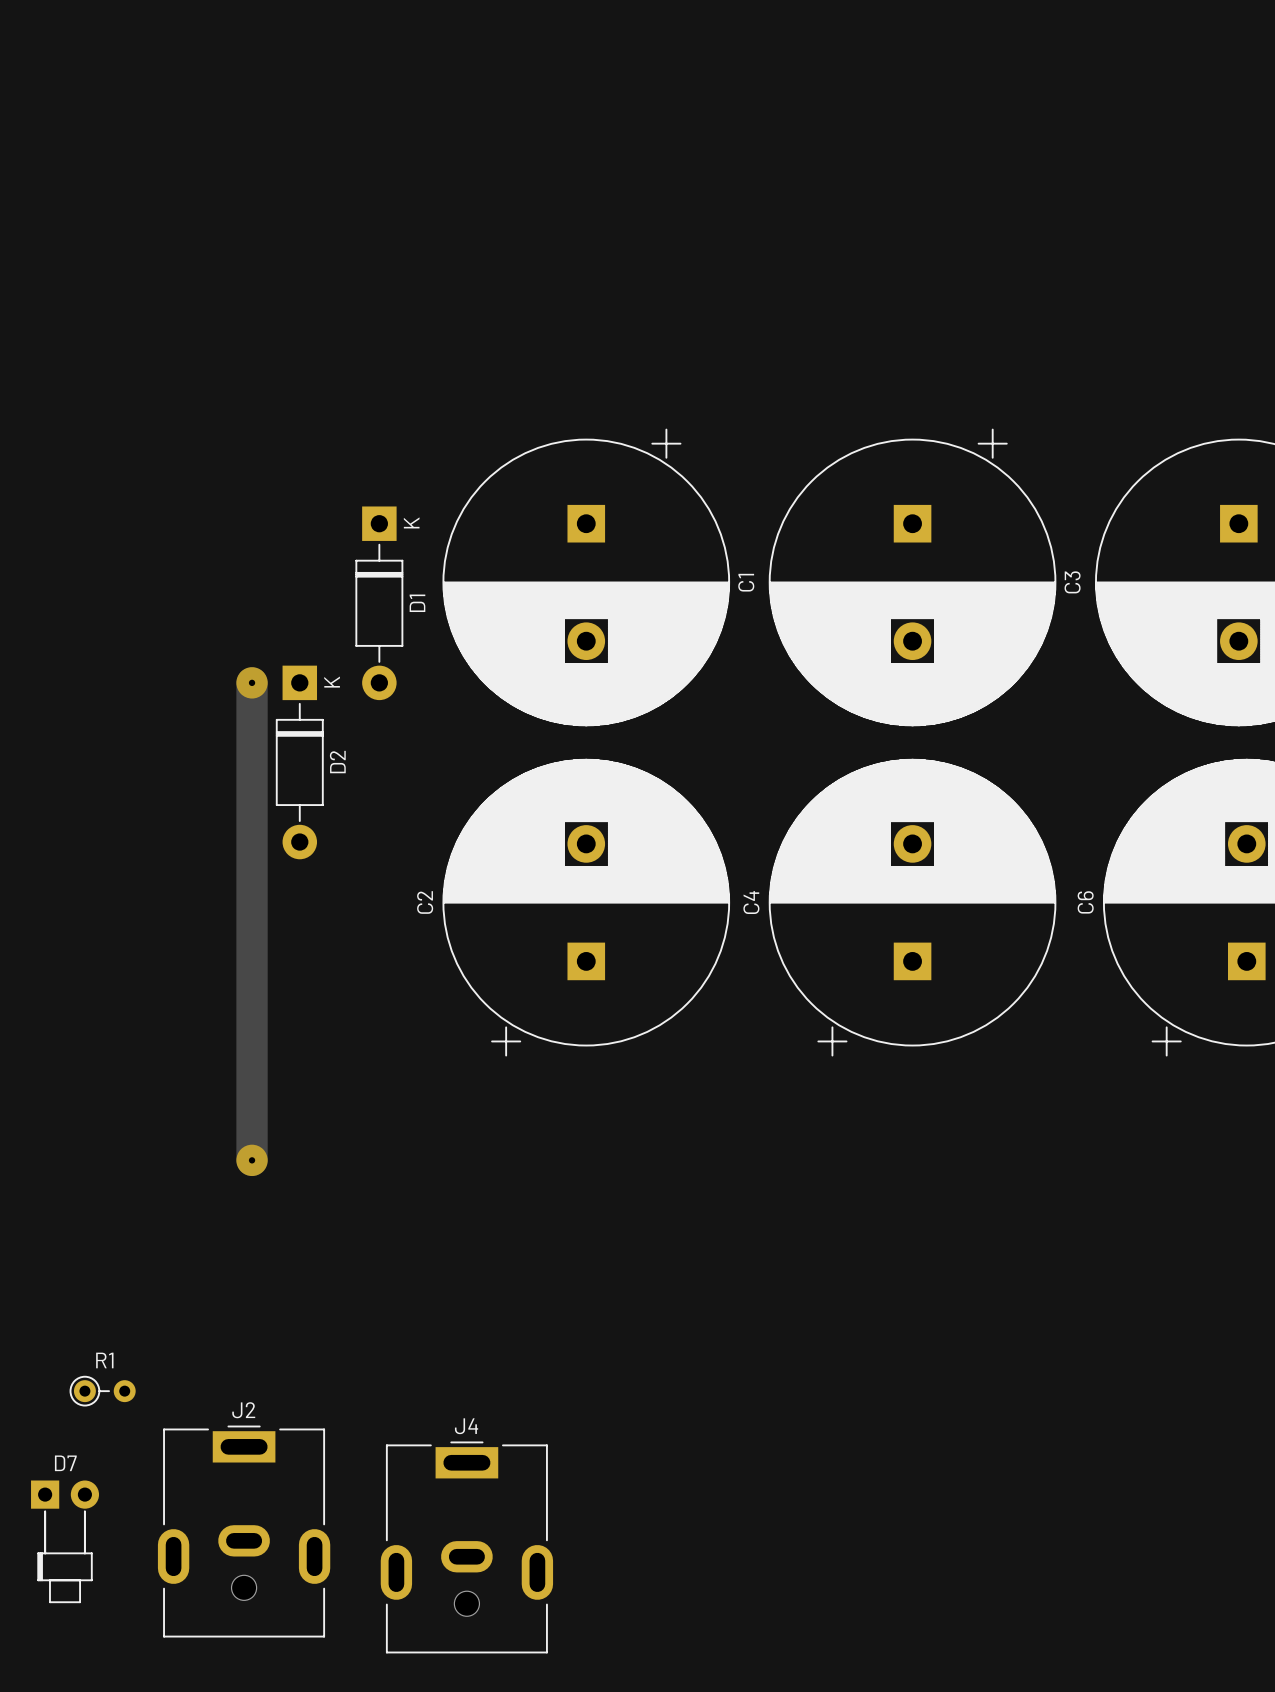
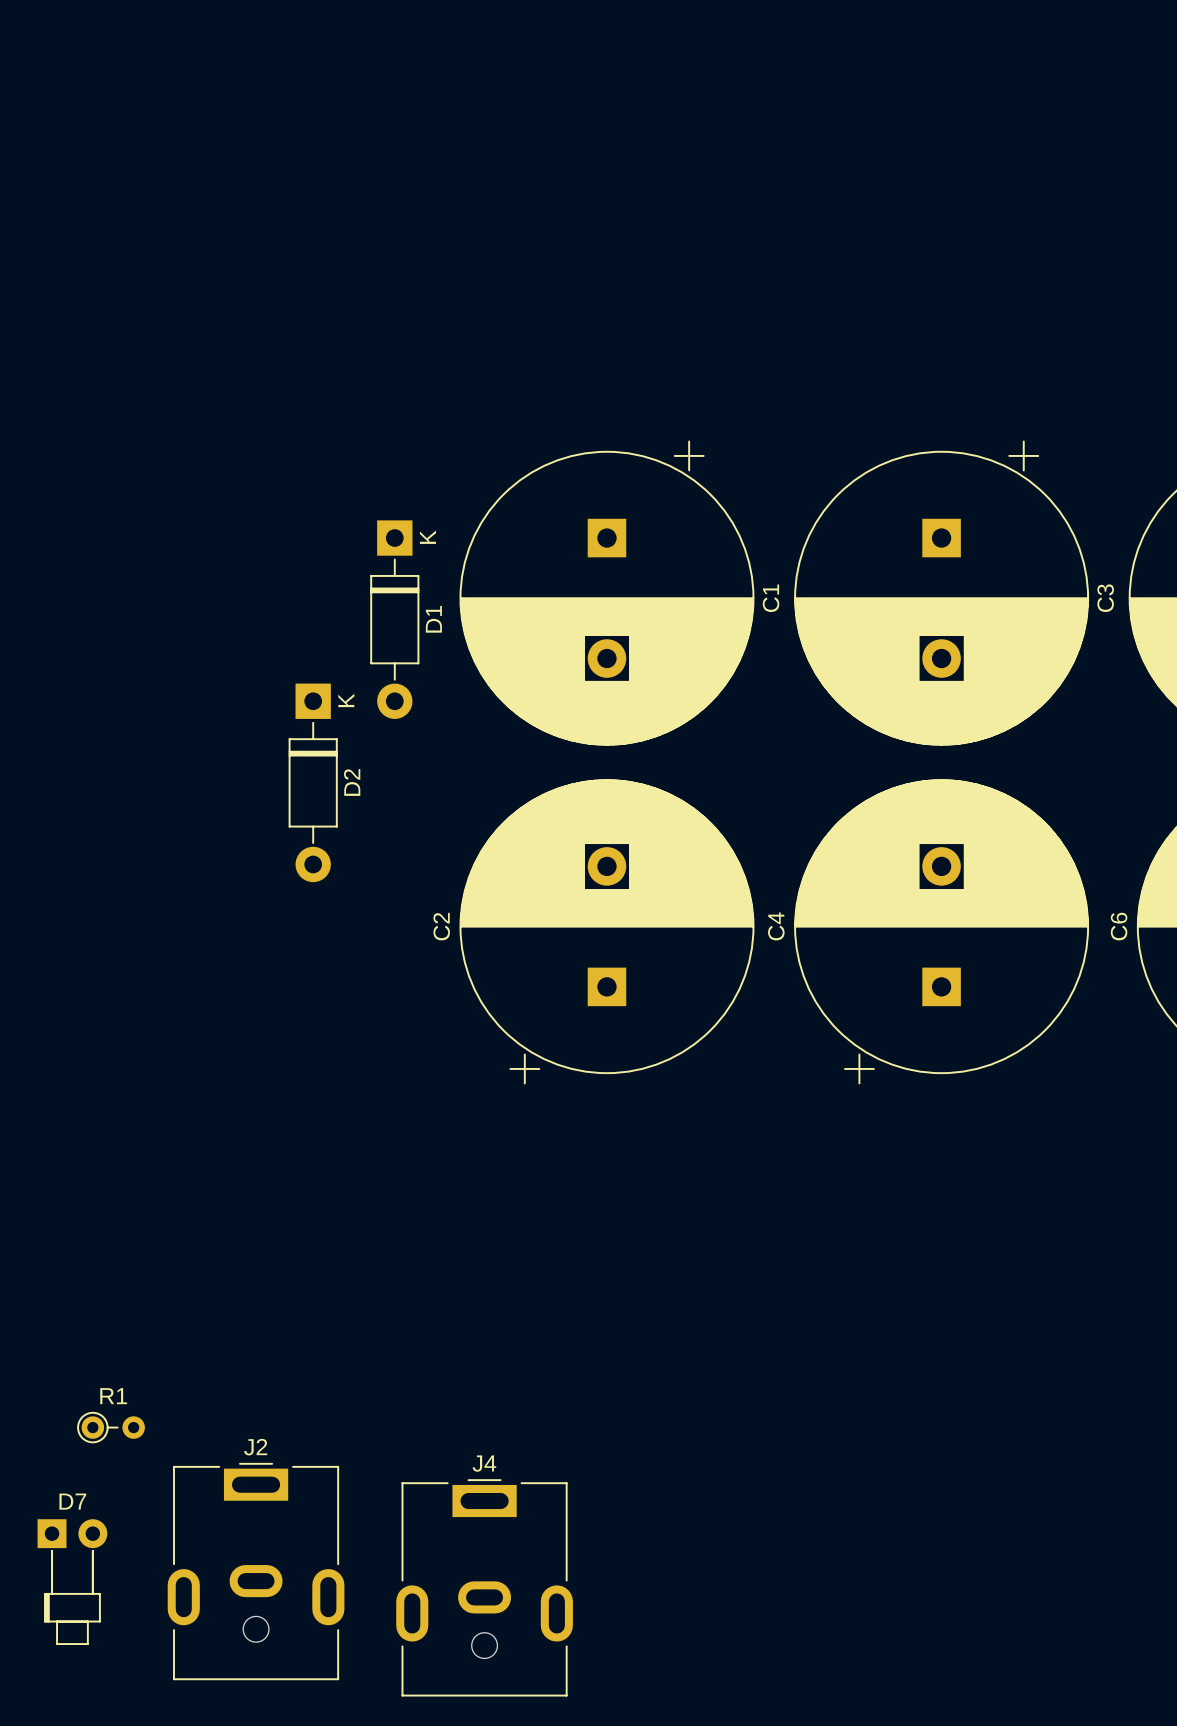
track: (252, 682) (252, 1160) -> none
via: (252, 682) -> none
via: (252, 1160) -> none

